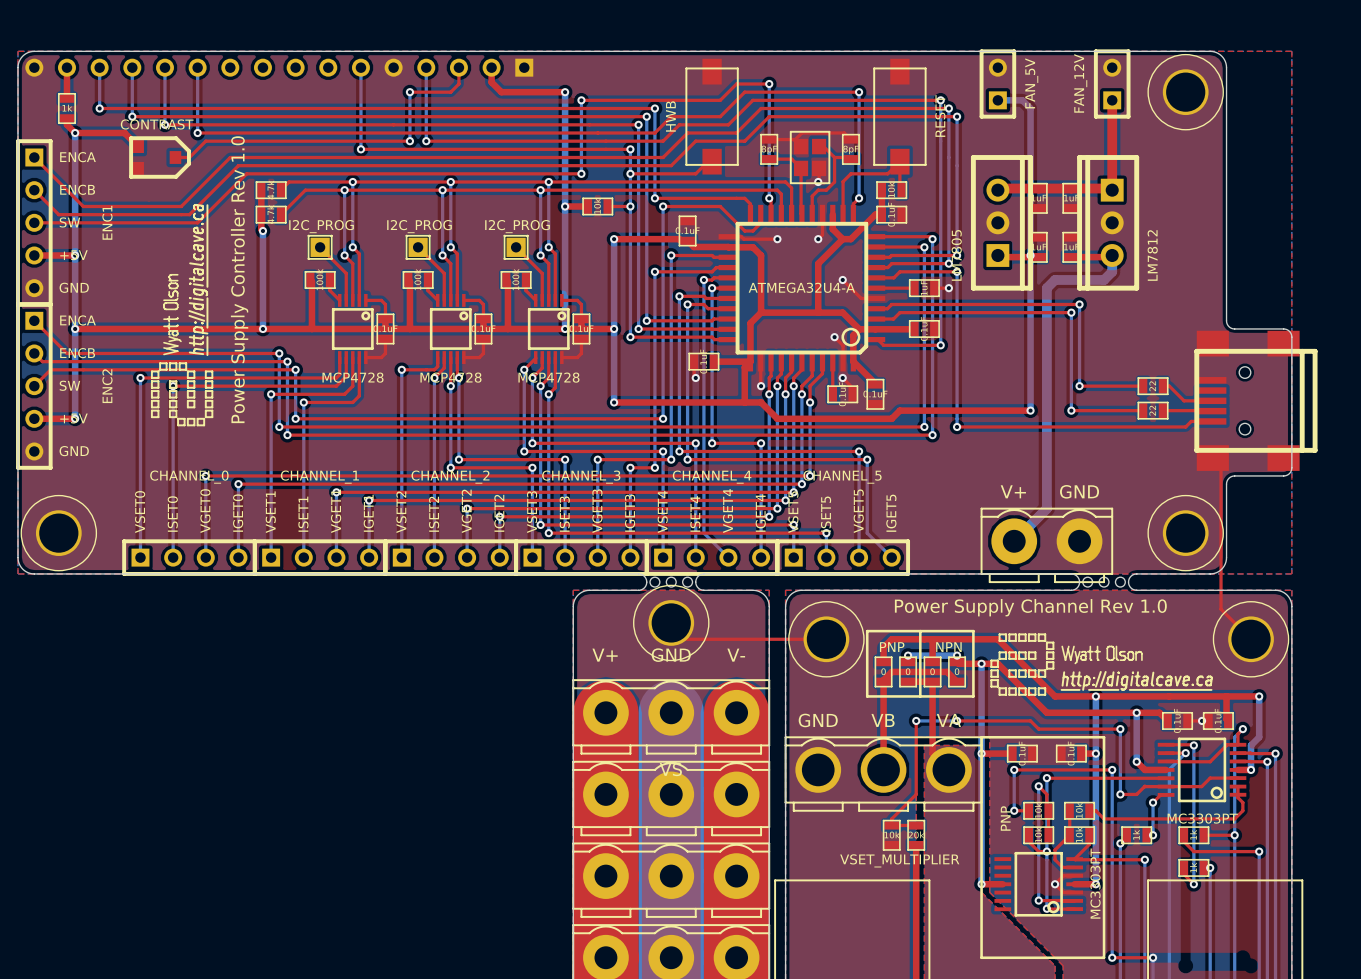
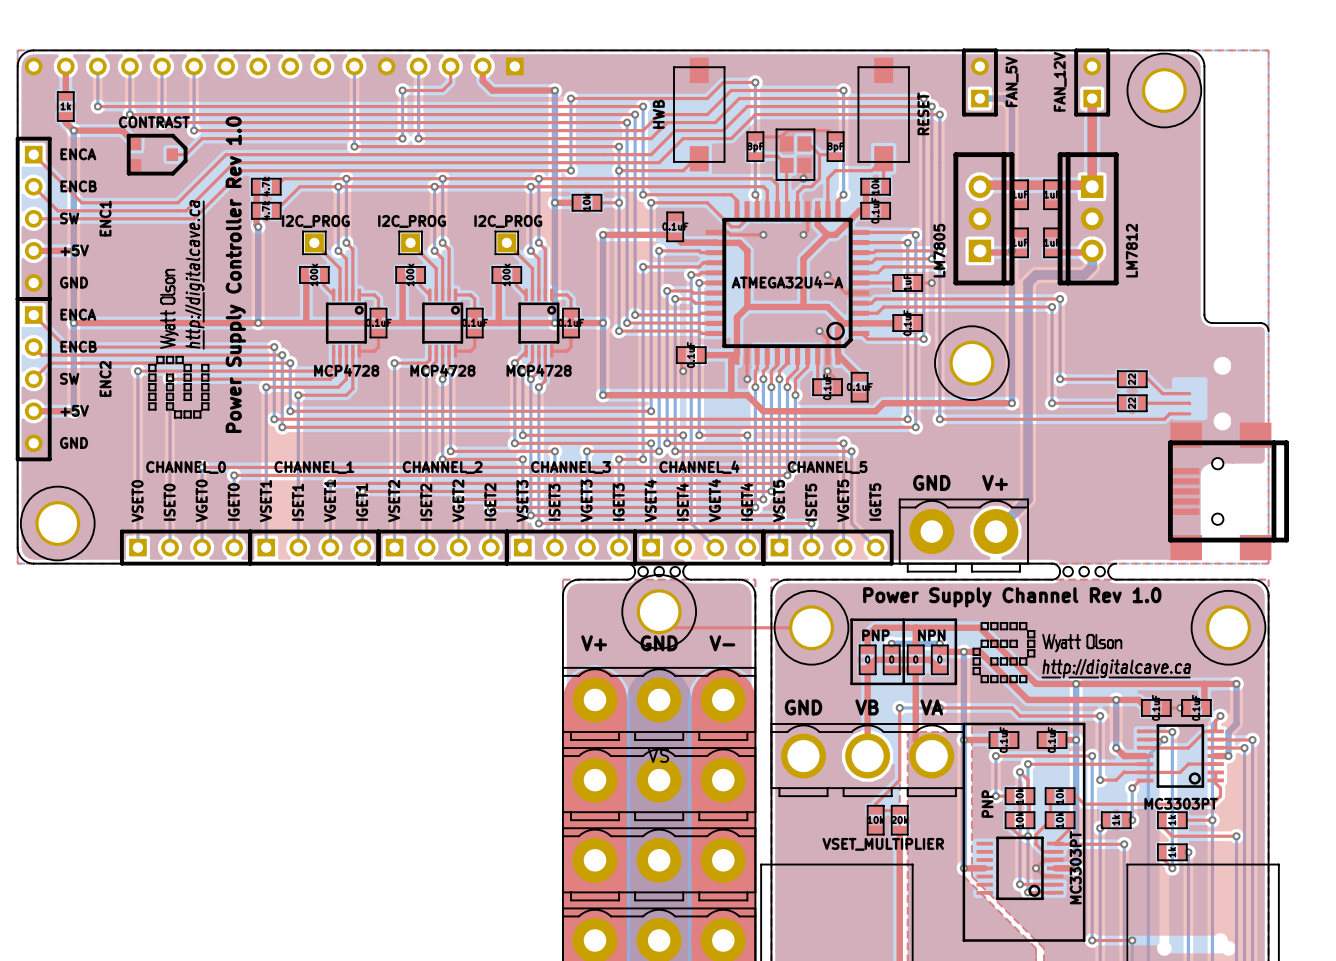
board edge: (1291, 337) (1290, 471) (1284, 475) (1234, 475) (1228, 479) (1226, 484) (1226, 559) (1223, 567) (1218, 571) (1210, 573) (1136, 573) -> none
part position: (1255, 400) -> (1228, 491)
top track: (1221, 458) (1221, 609) (1251, 639) -> none
text position: GND (1079, 491) -> GND (931, 482)
part position: (1185, 533) -> (971, 363)
part position: (1046, 545) -> (963, 535)

